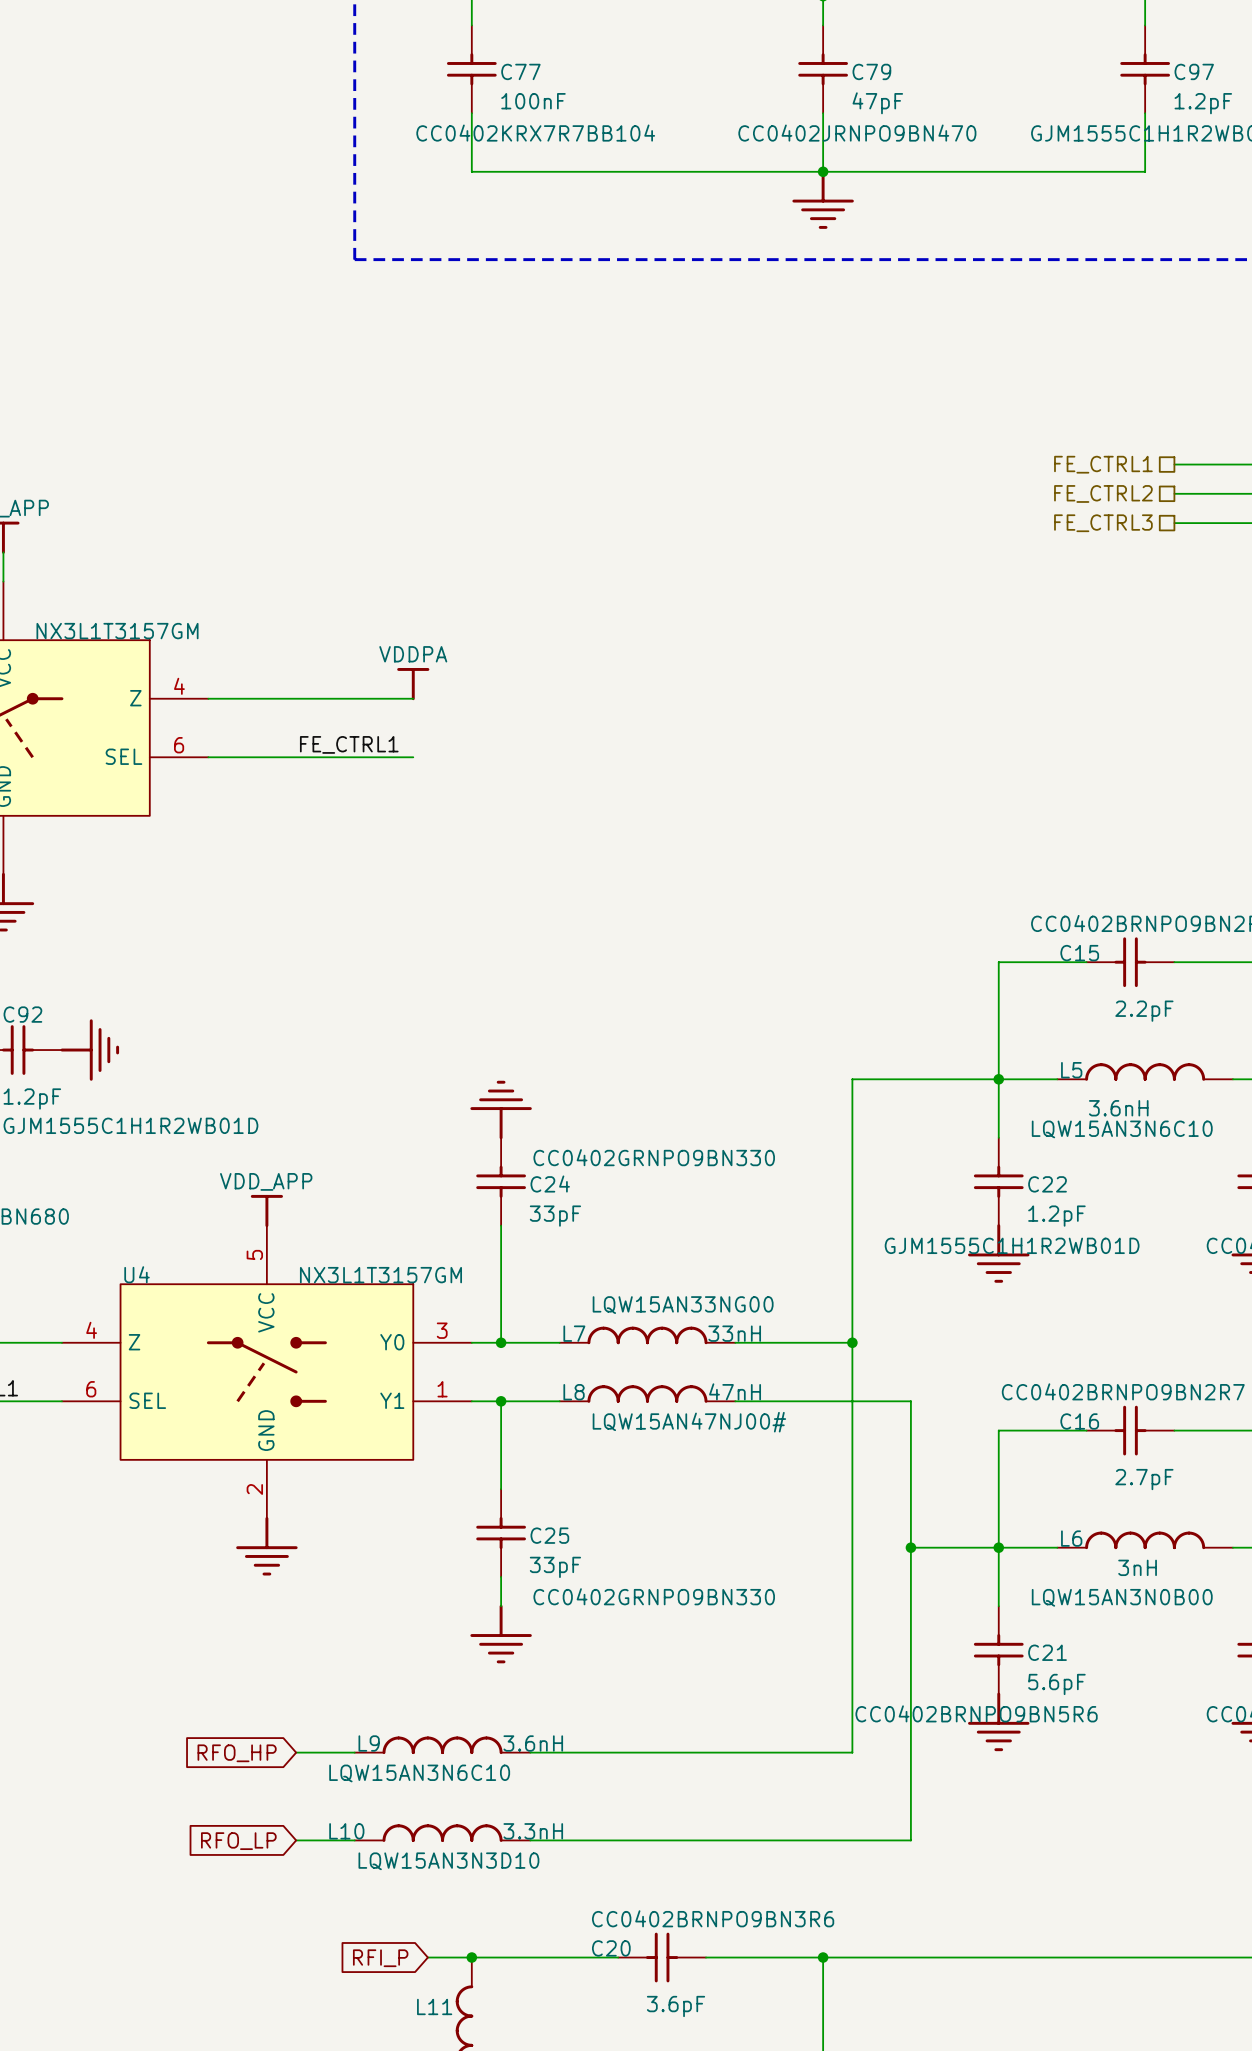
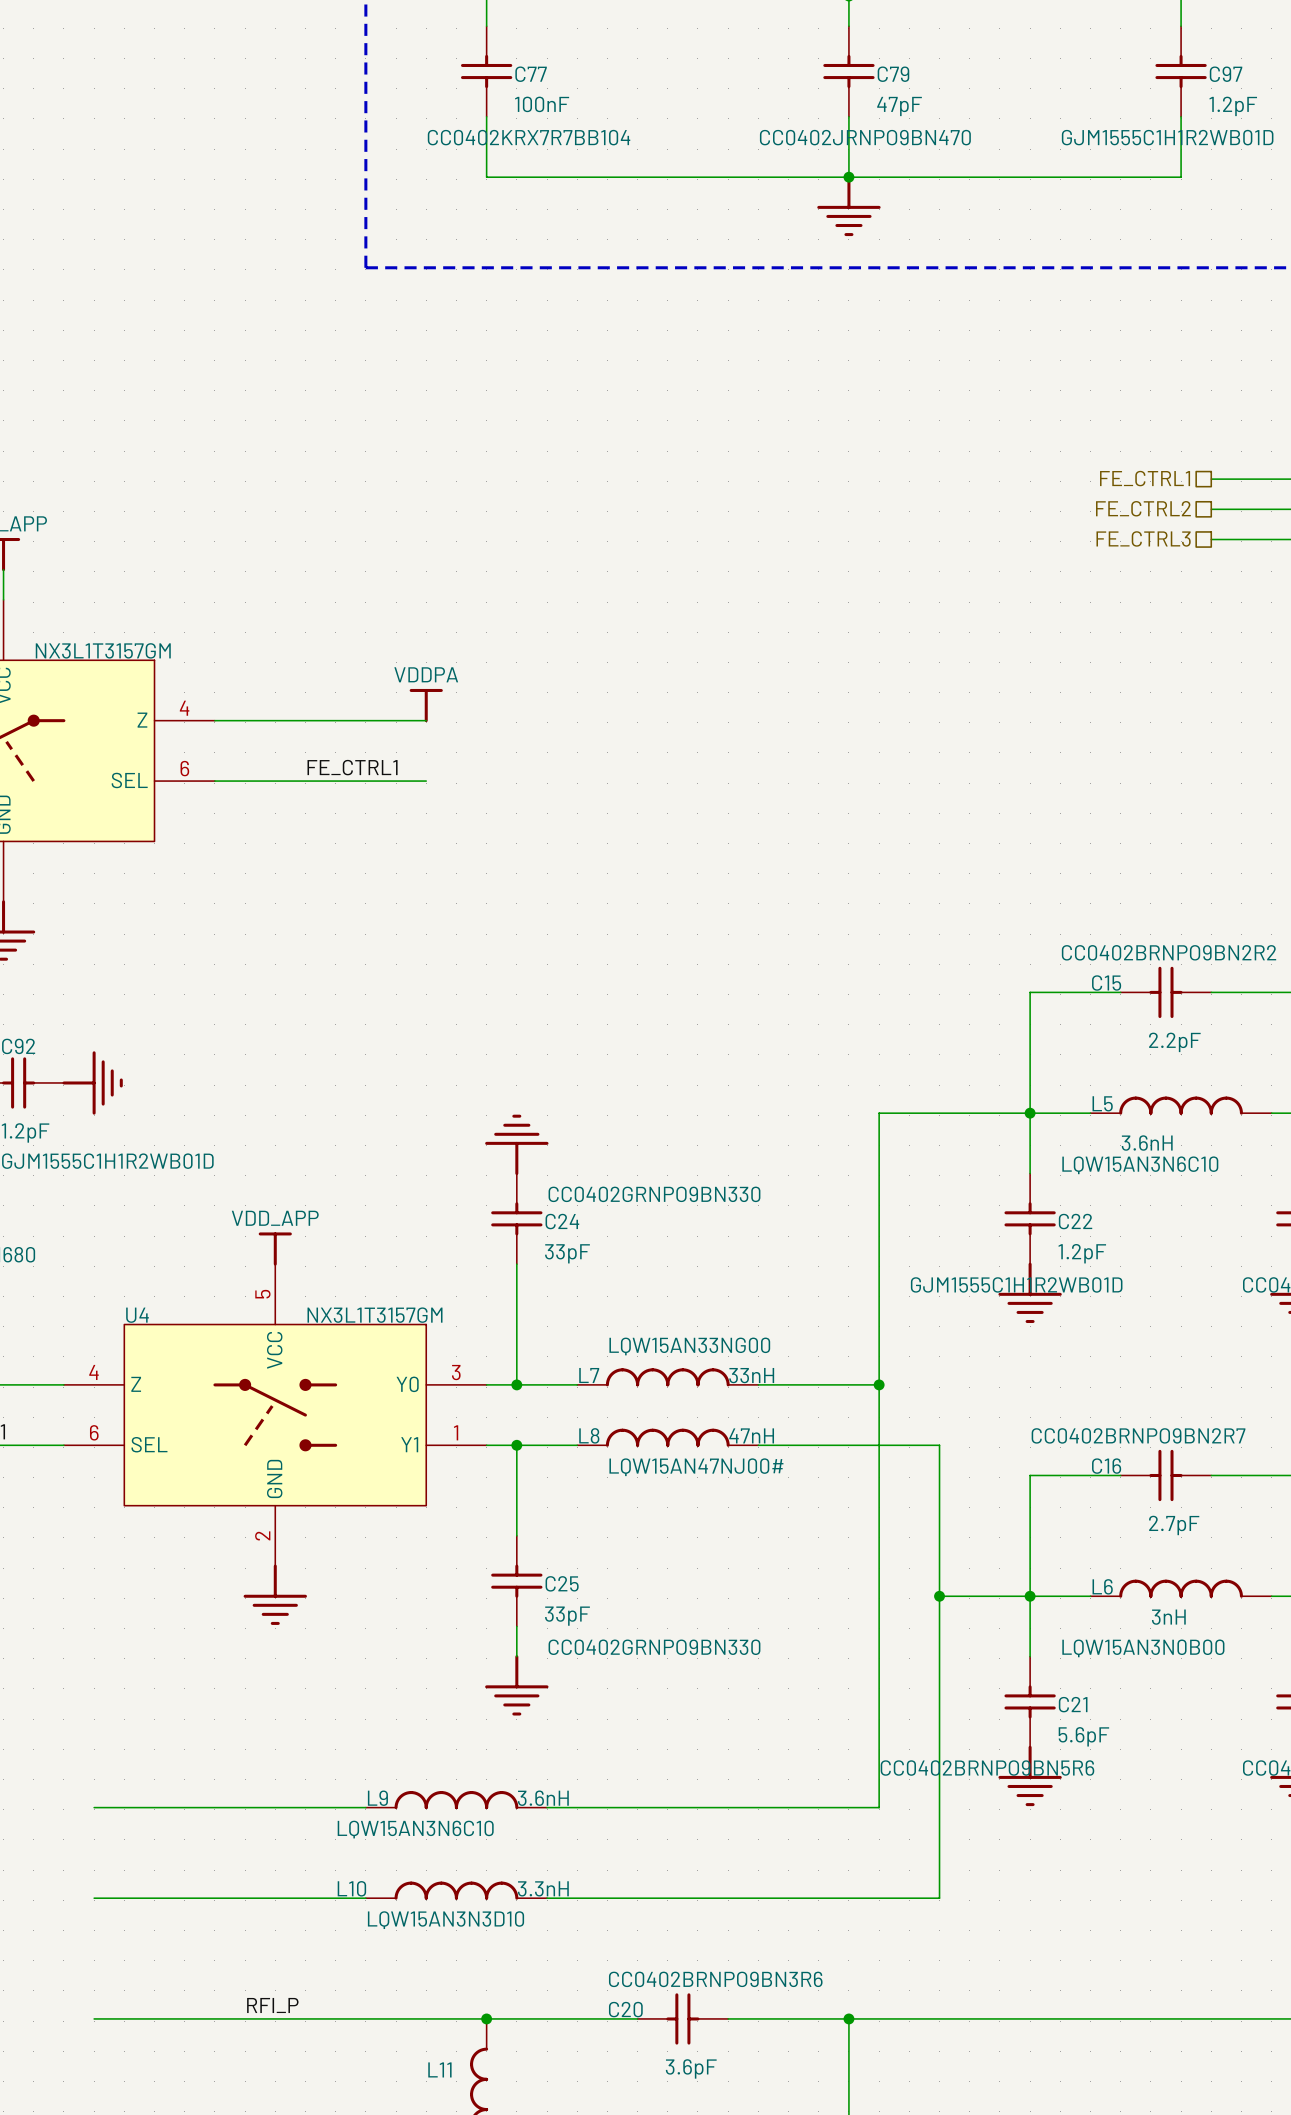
wire: none -> (94, 1807) (305, 1807)
global label: RFO_HP (237, 1753) -> none
wire: none -> (94, 1898) (305, 1898)
global label: RFO_LP (238, 1841) -> none
label: none -> RFI_P (272, 2005)
wire: none -> (94, 2018) (441, 2018)
global label: RFI_P (380, 1958) -> none

